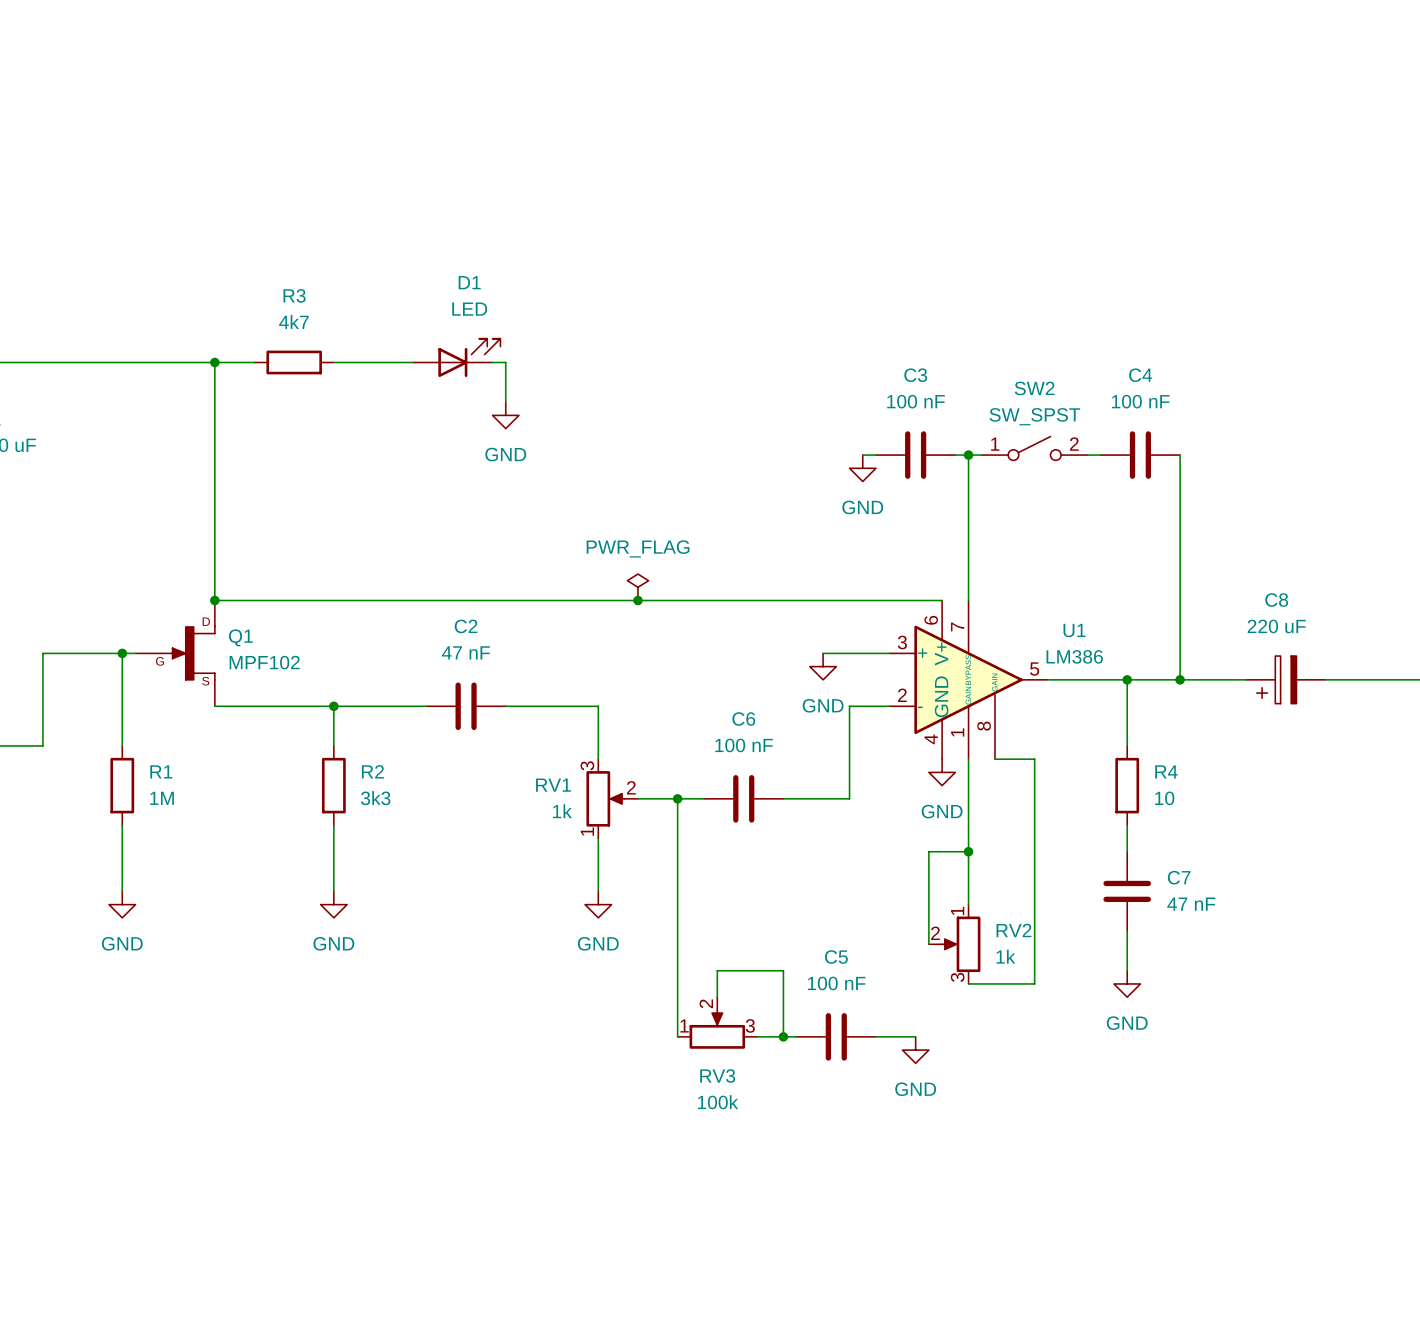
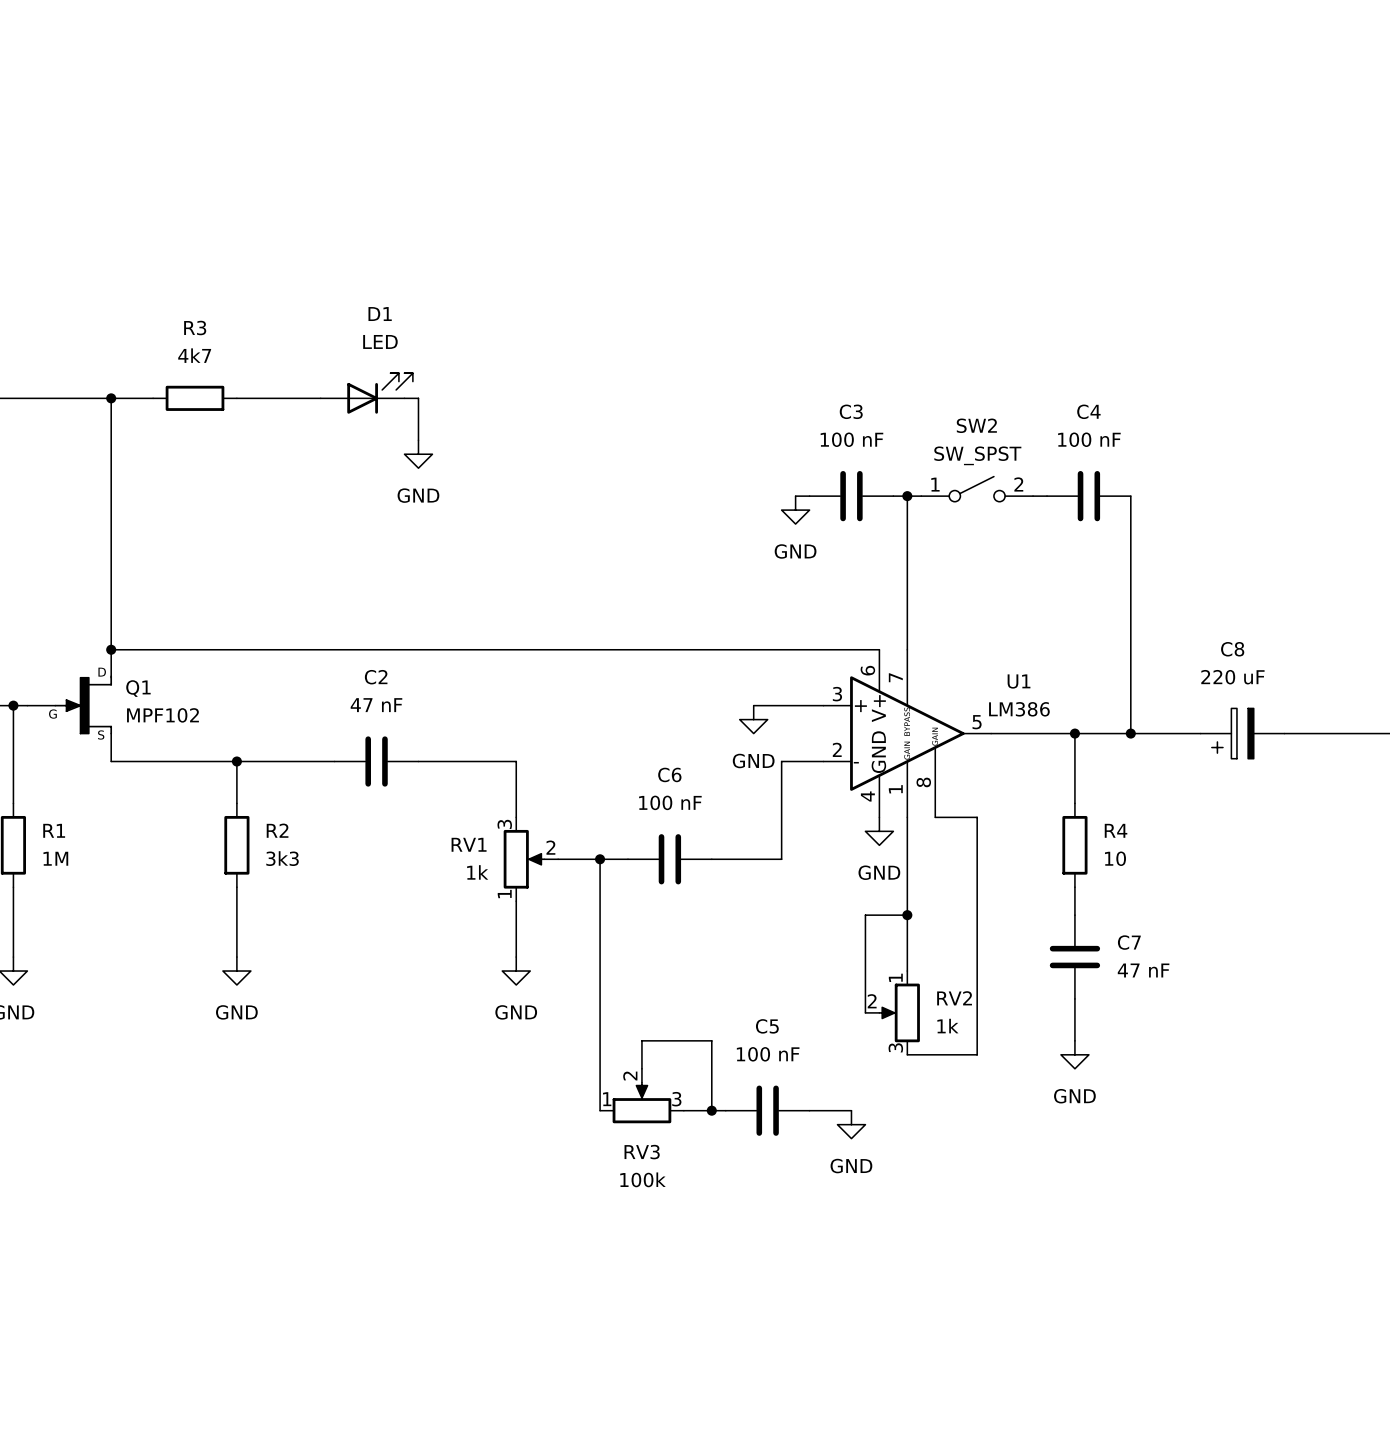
power symbol: PWR_FLAG (637, 587) -> none
junction: (637, 600) -> none

